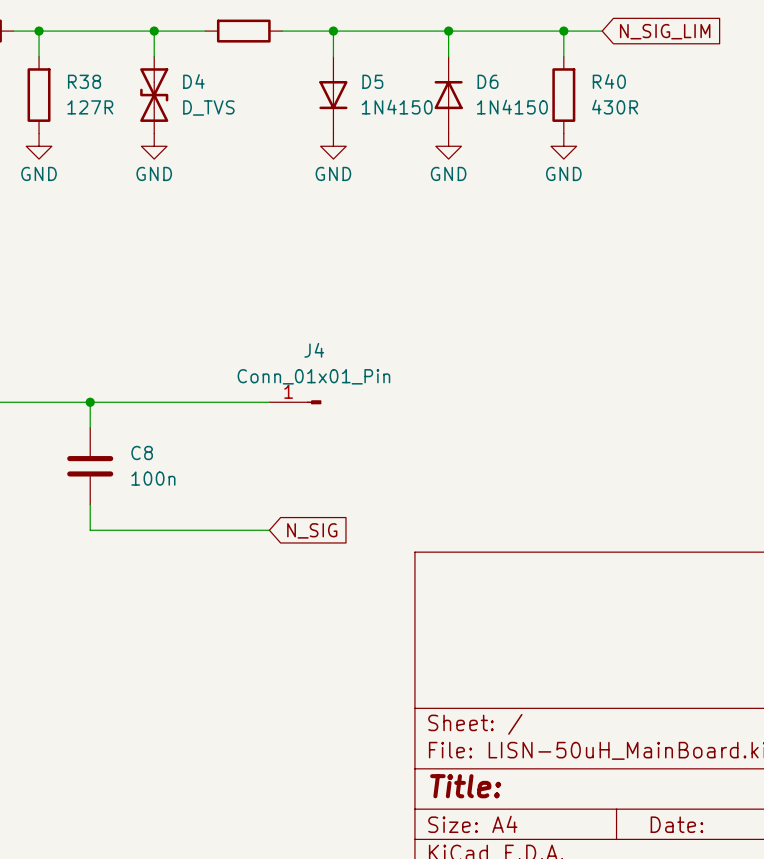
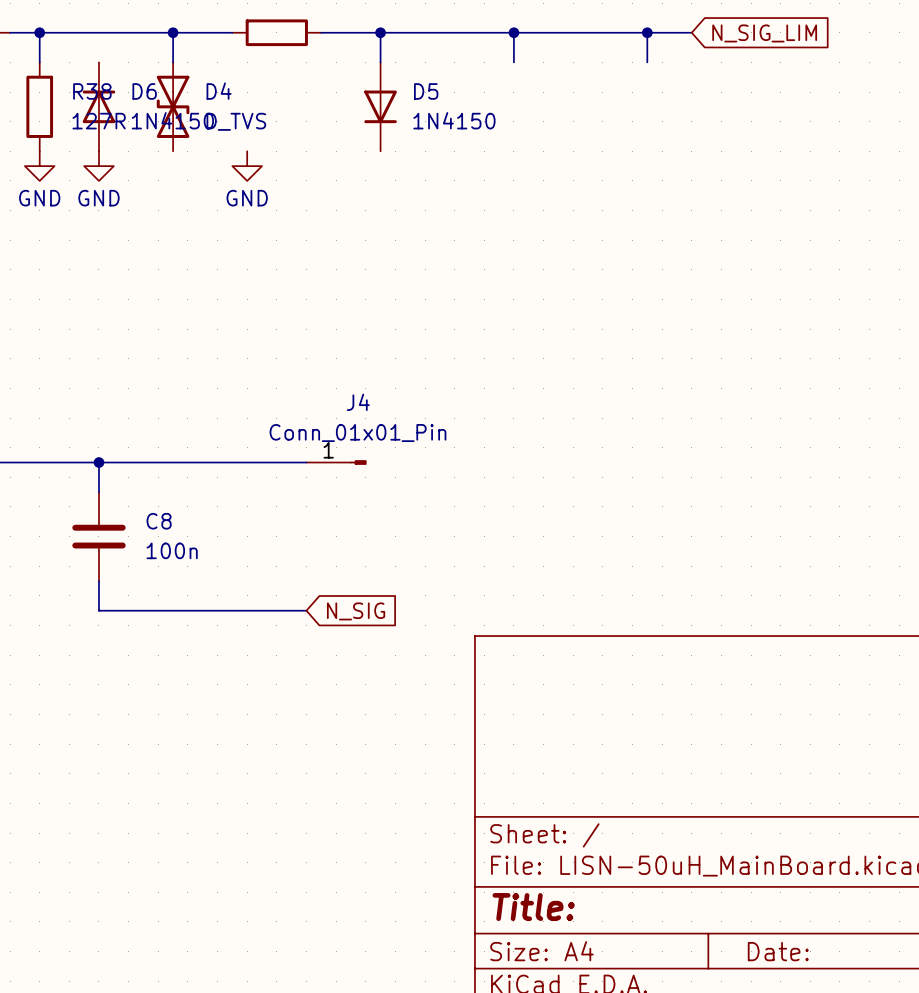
D6 position: (448, 95) -> (98, 106)
R40: 430R (563, 95) -> none
power symbol: none -> GND (98, 166)
power symbol: GND (154, 146) -> none
power symbol: none -> GND (247, 166)
power symbol: GND (333, 146) -> none
power symbol: GND (448, 146) -> none
power symbol: GND (563, 146) -> none

